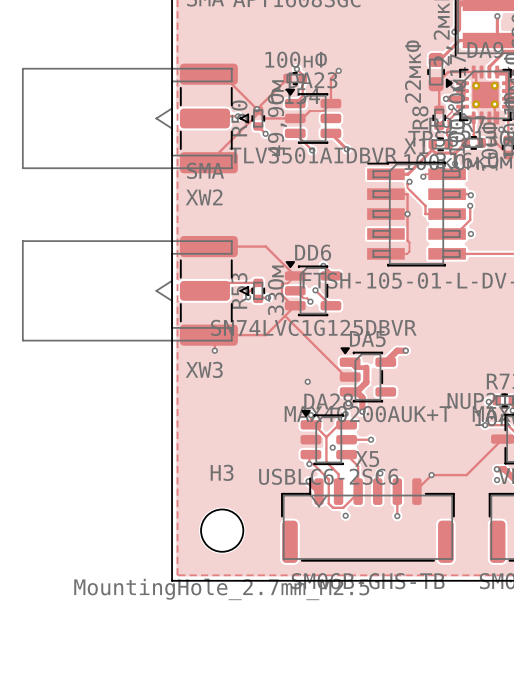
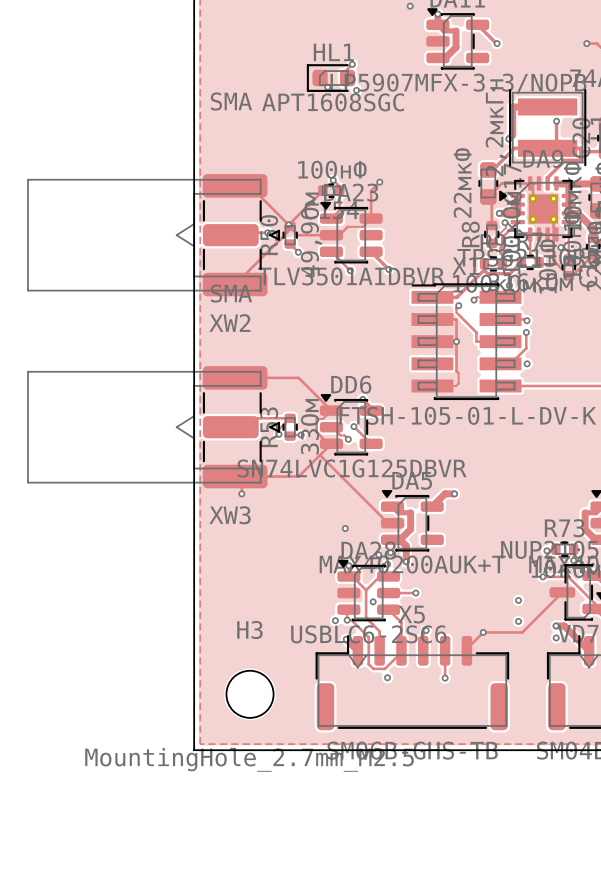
via: none -> (378, 554)
via: none -> (518, 600)
via: none -> (335, 620)
via: none -> (518, 621)

